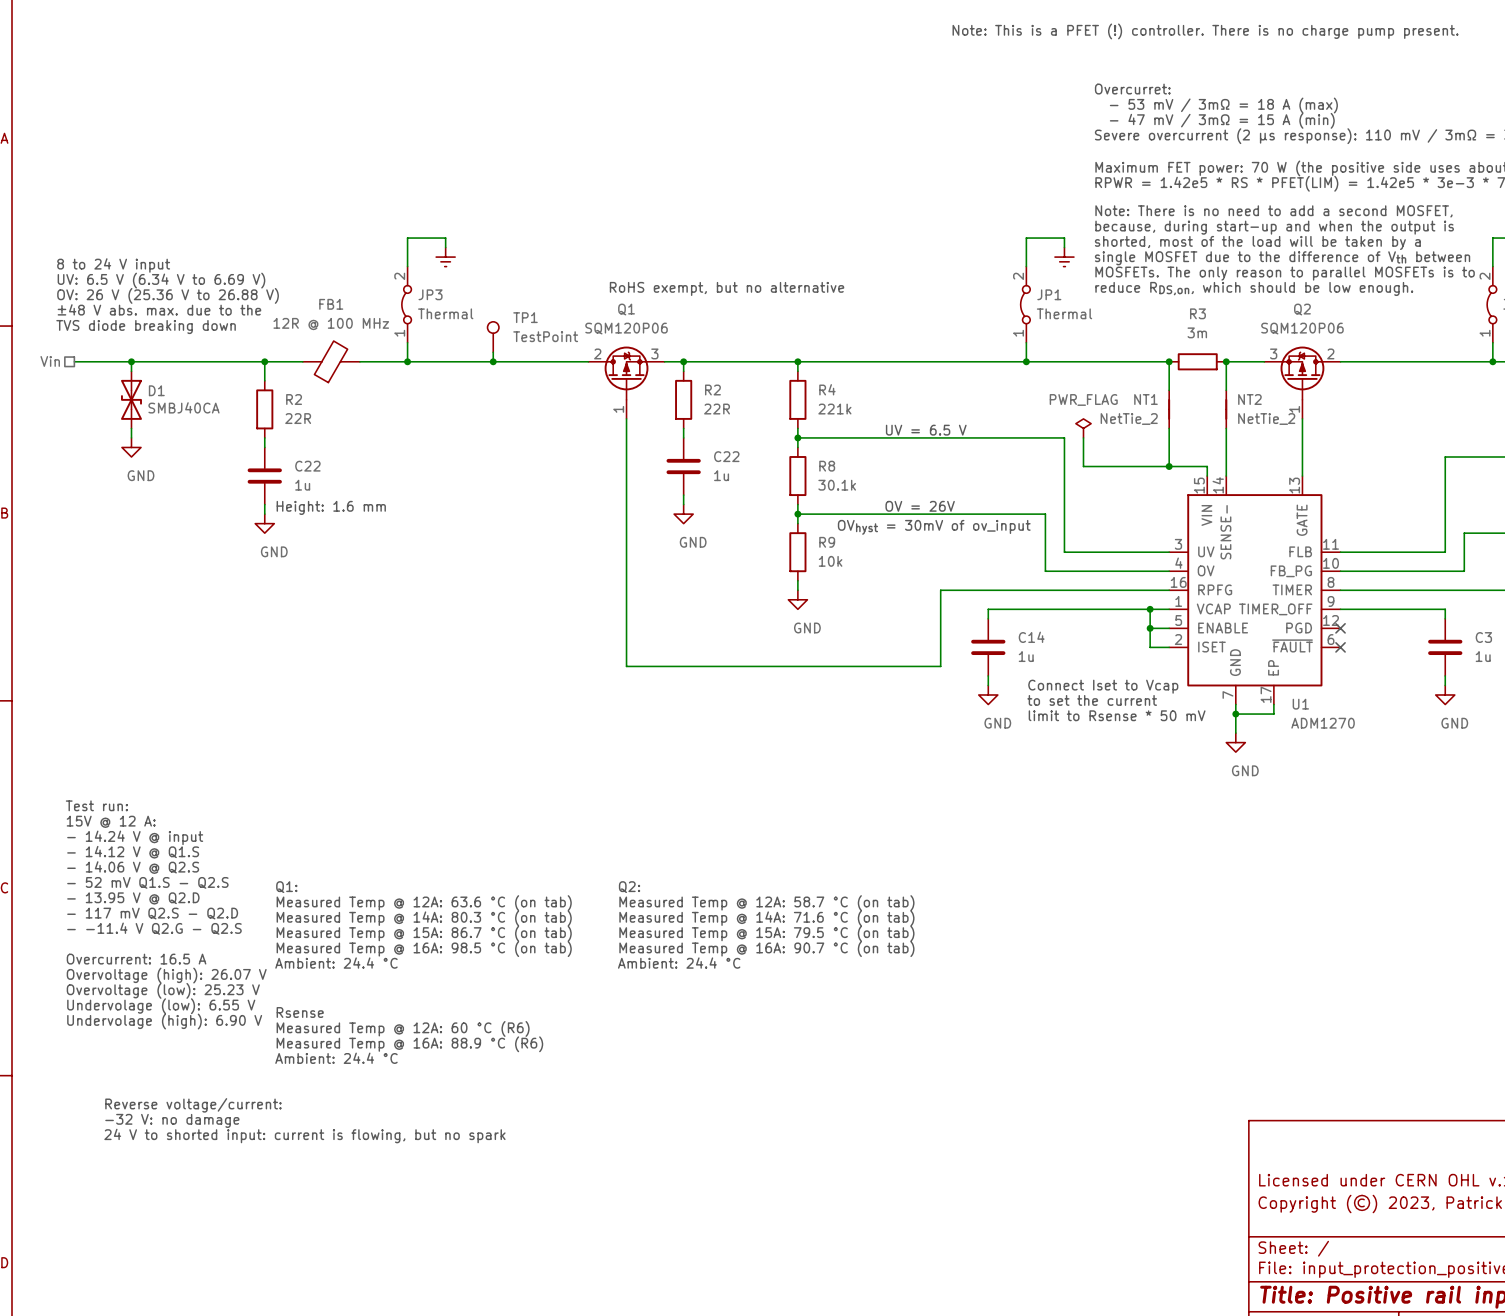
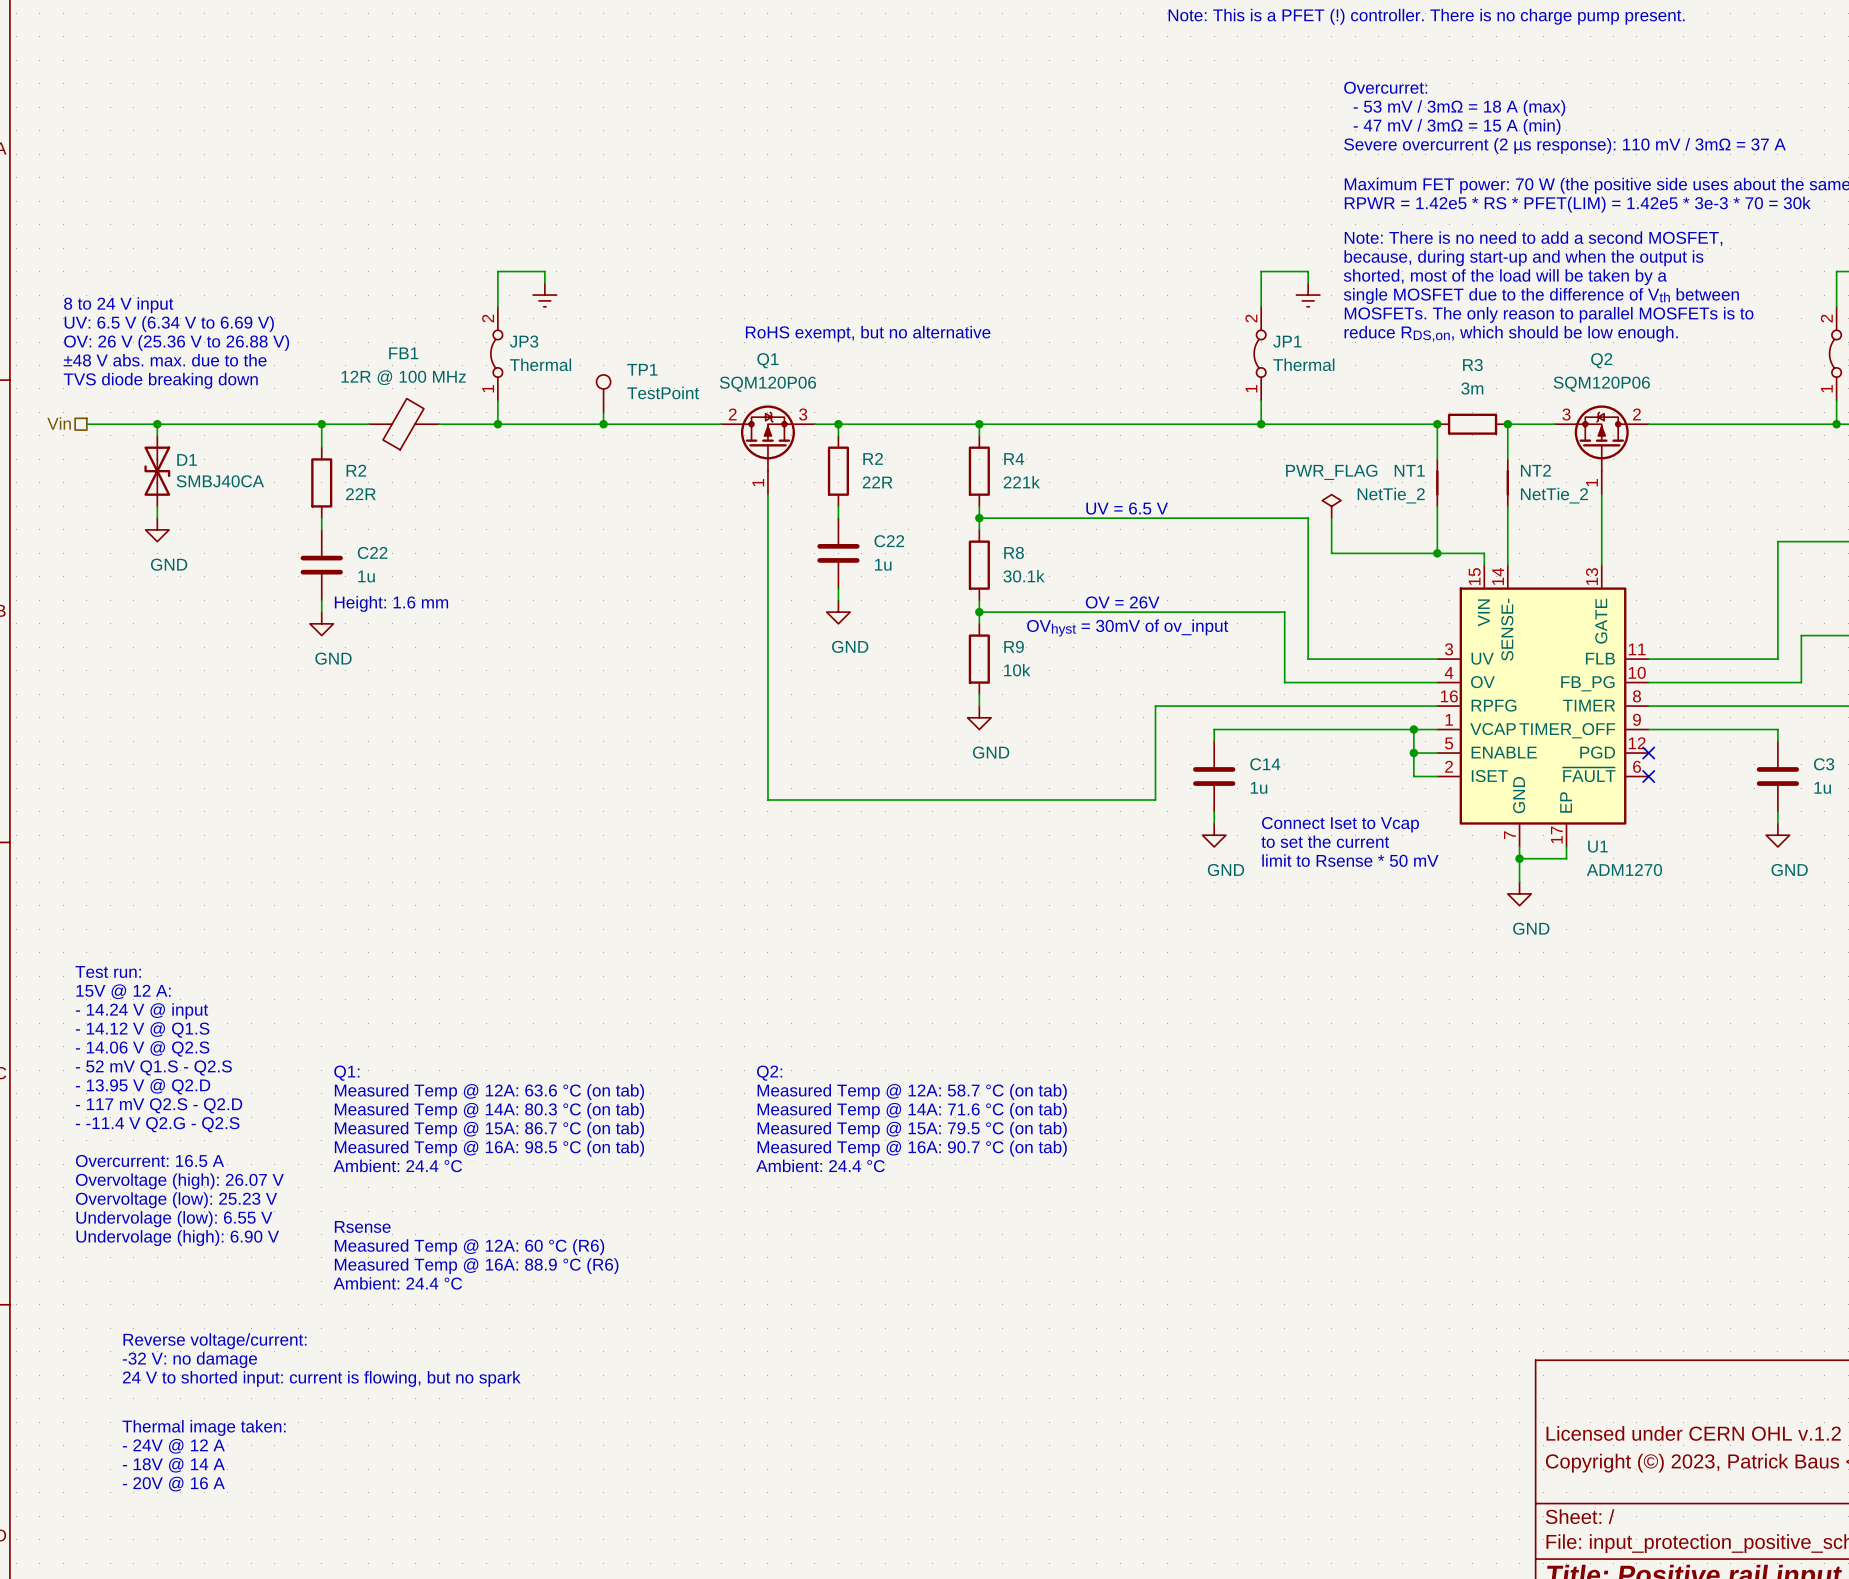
text: none -> Thermal image taken: (204, 1427)
text: none -> - 24V @ 12 A (173, 1446)
text: none -> - 18V @ 14 A (173, 1465)
text: none -> - 20V @ 16 A (173, 1484)

